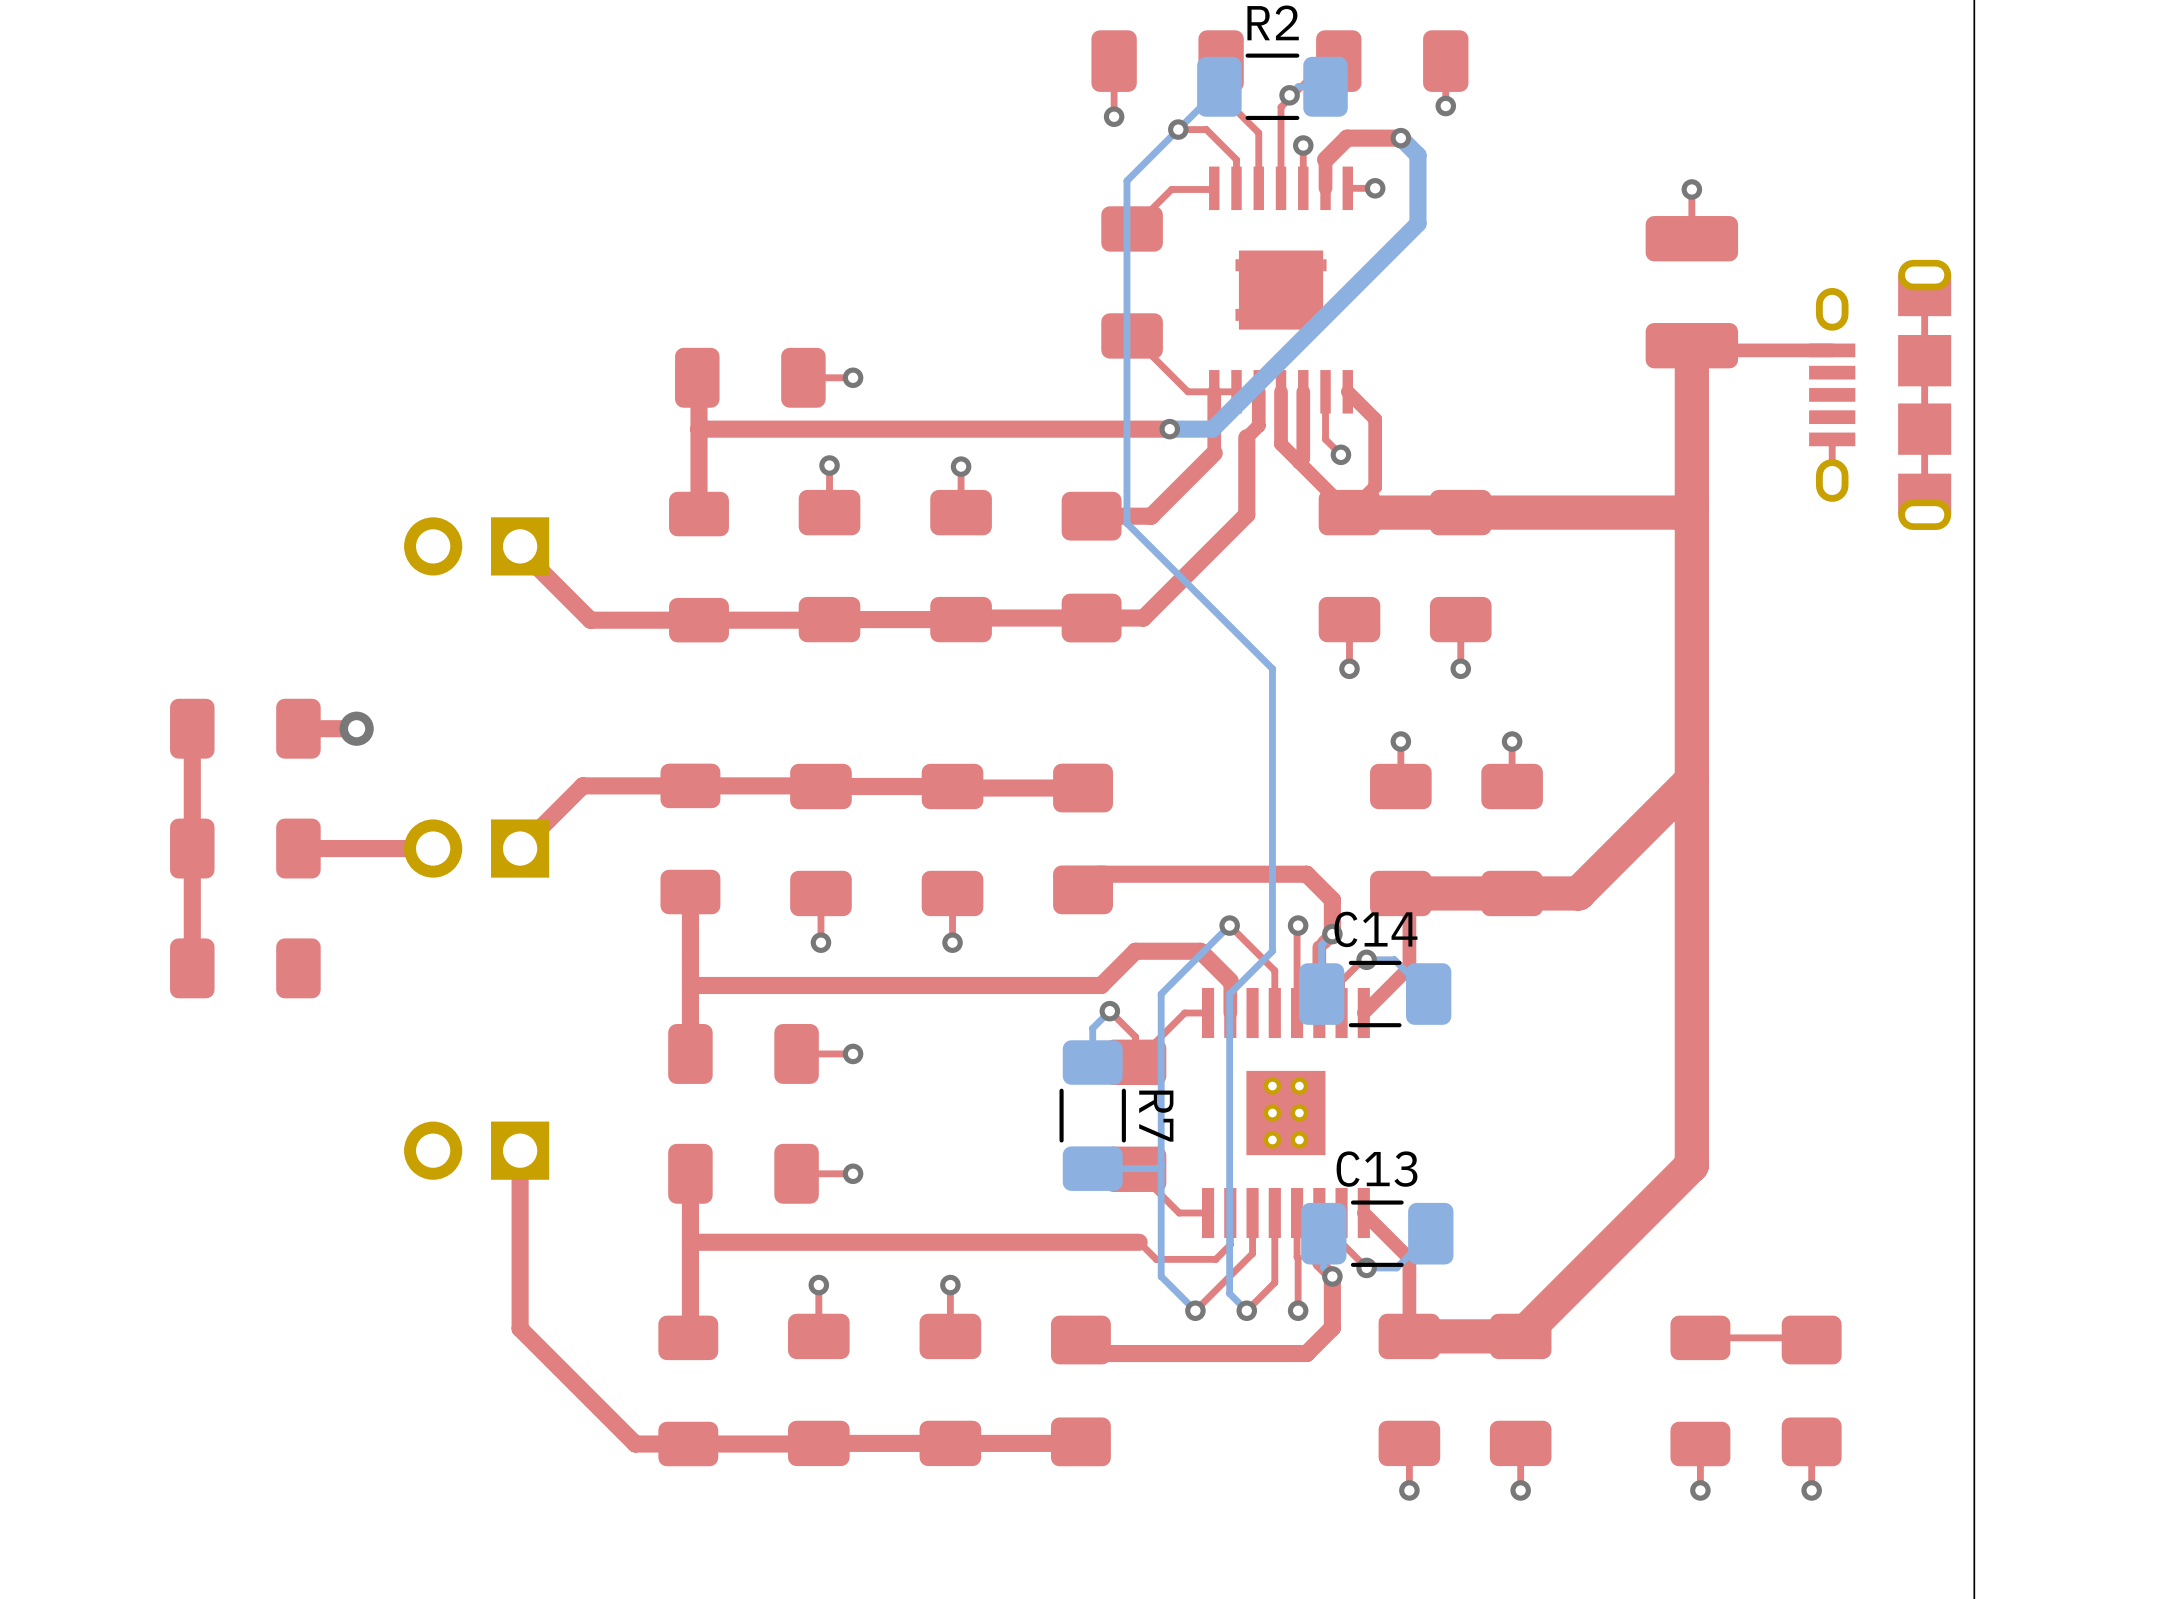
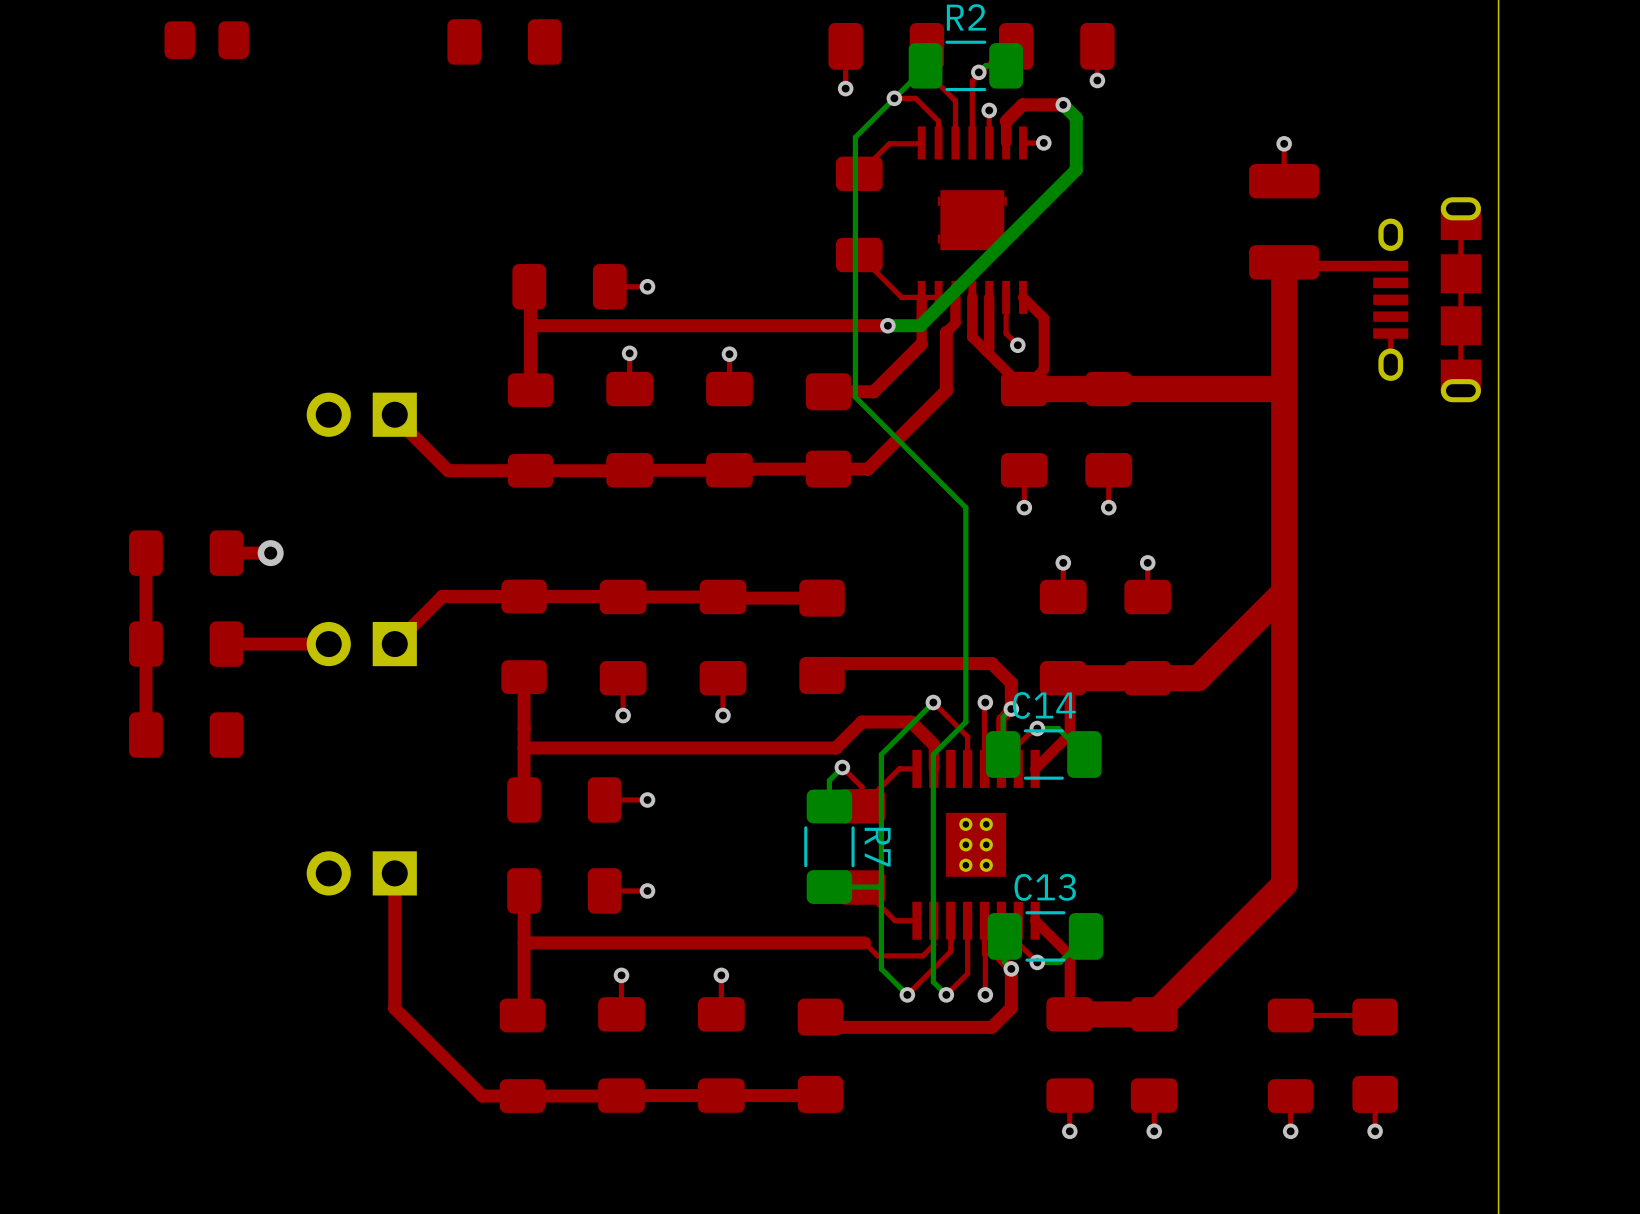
part: none -> (206, 40)
part: none -> (504, 41)

